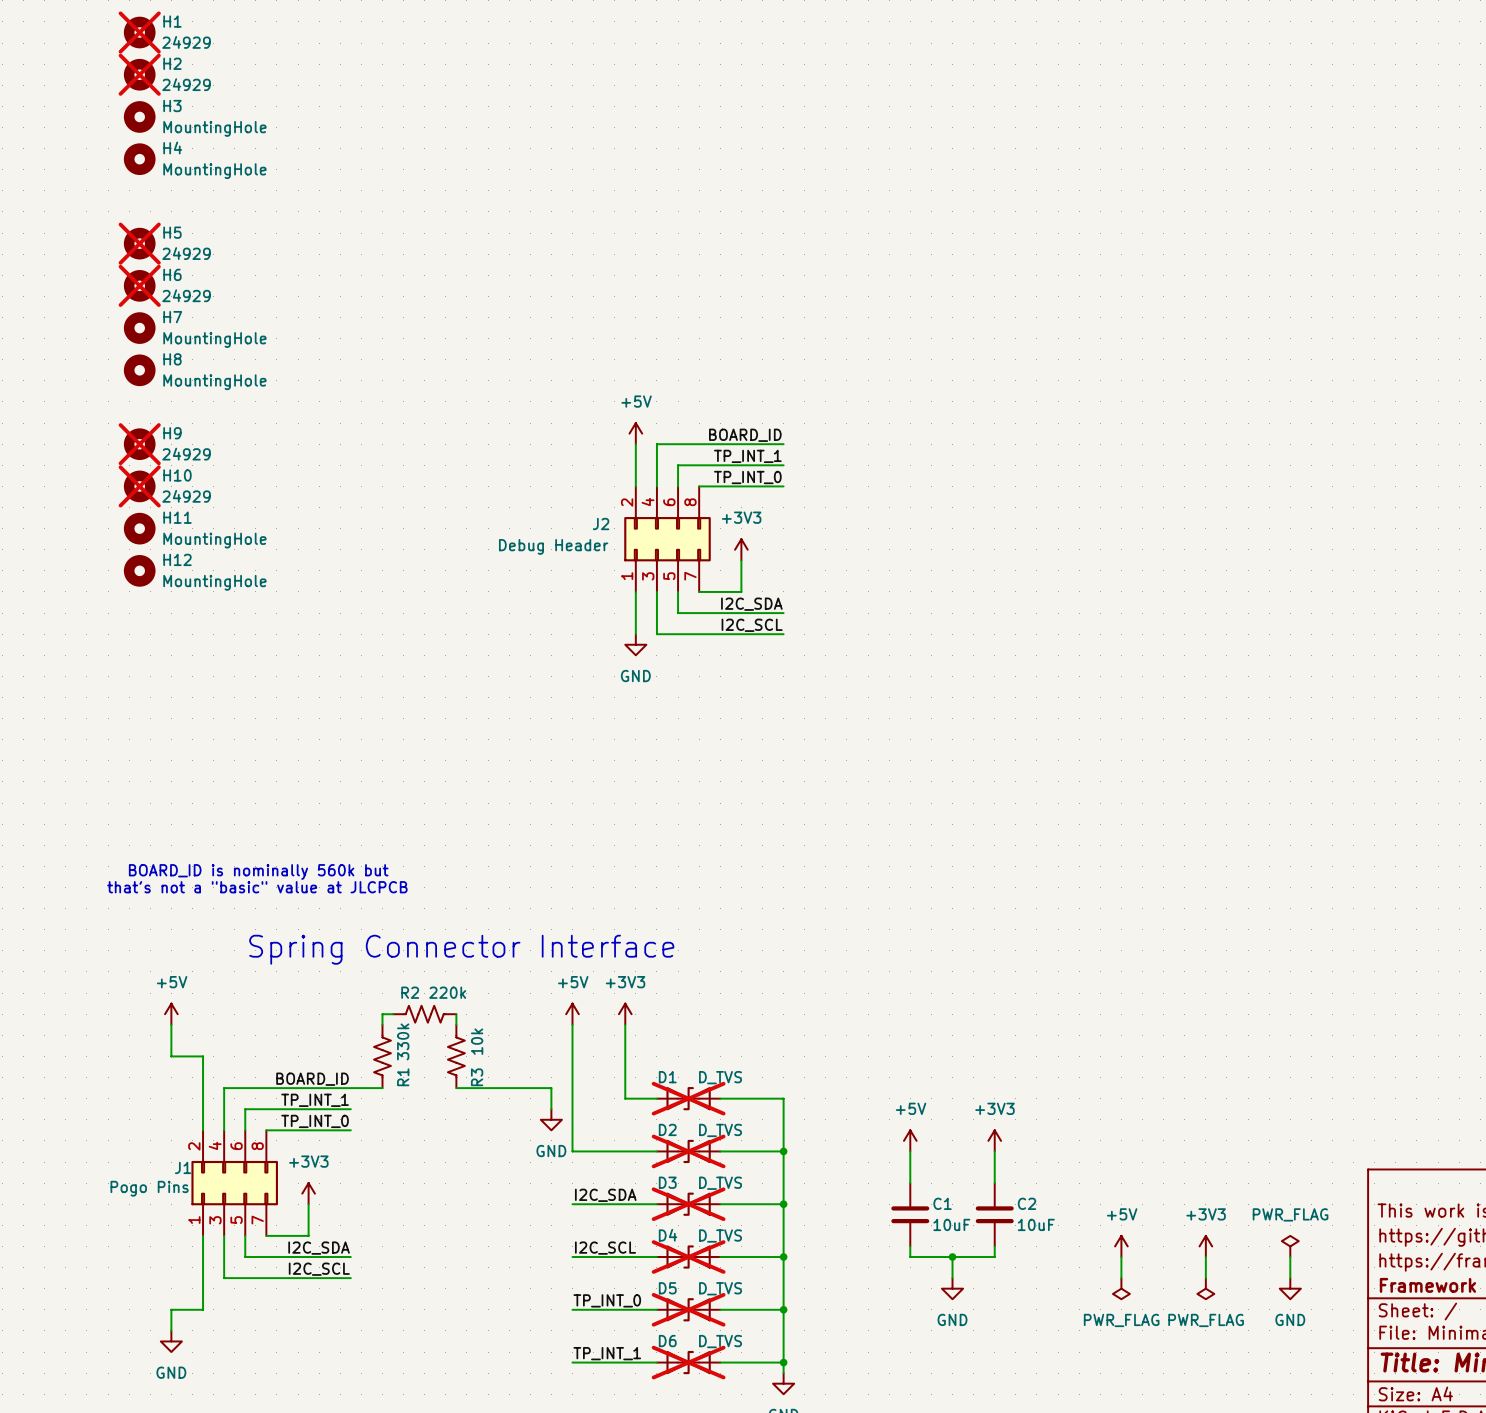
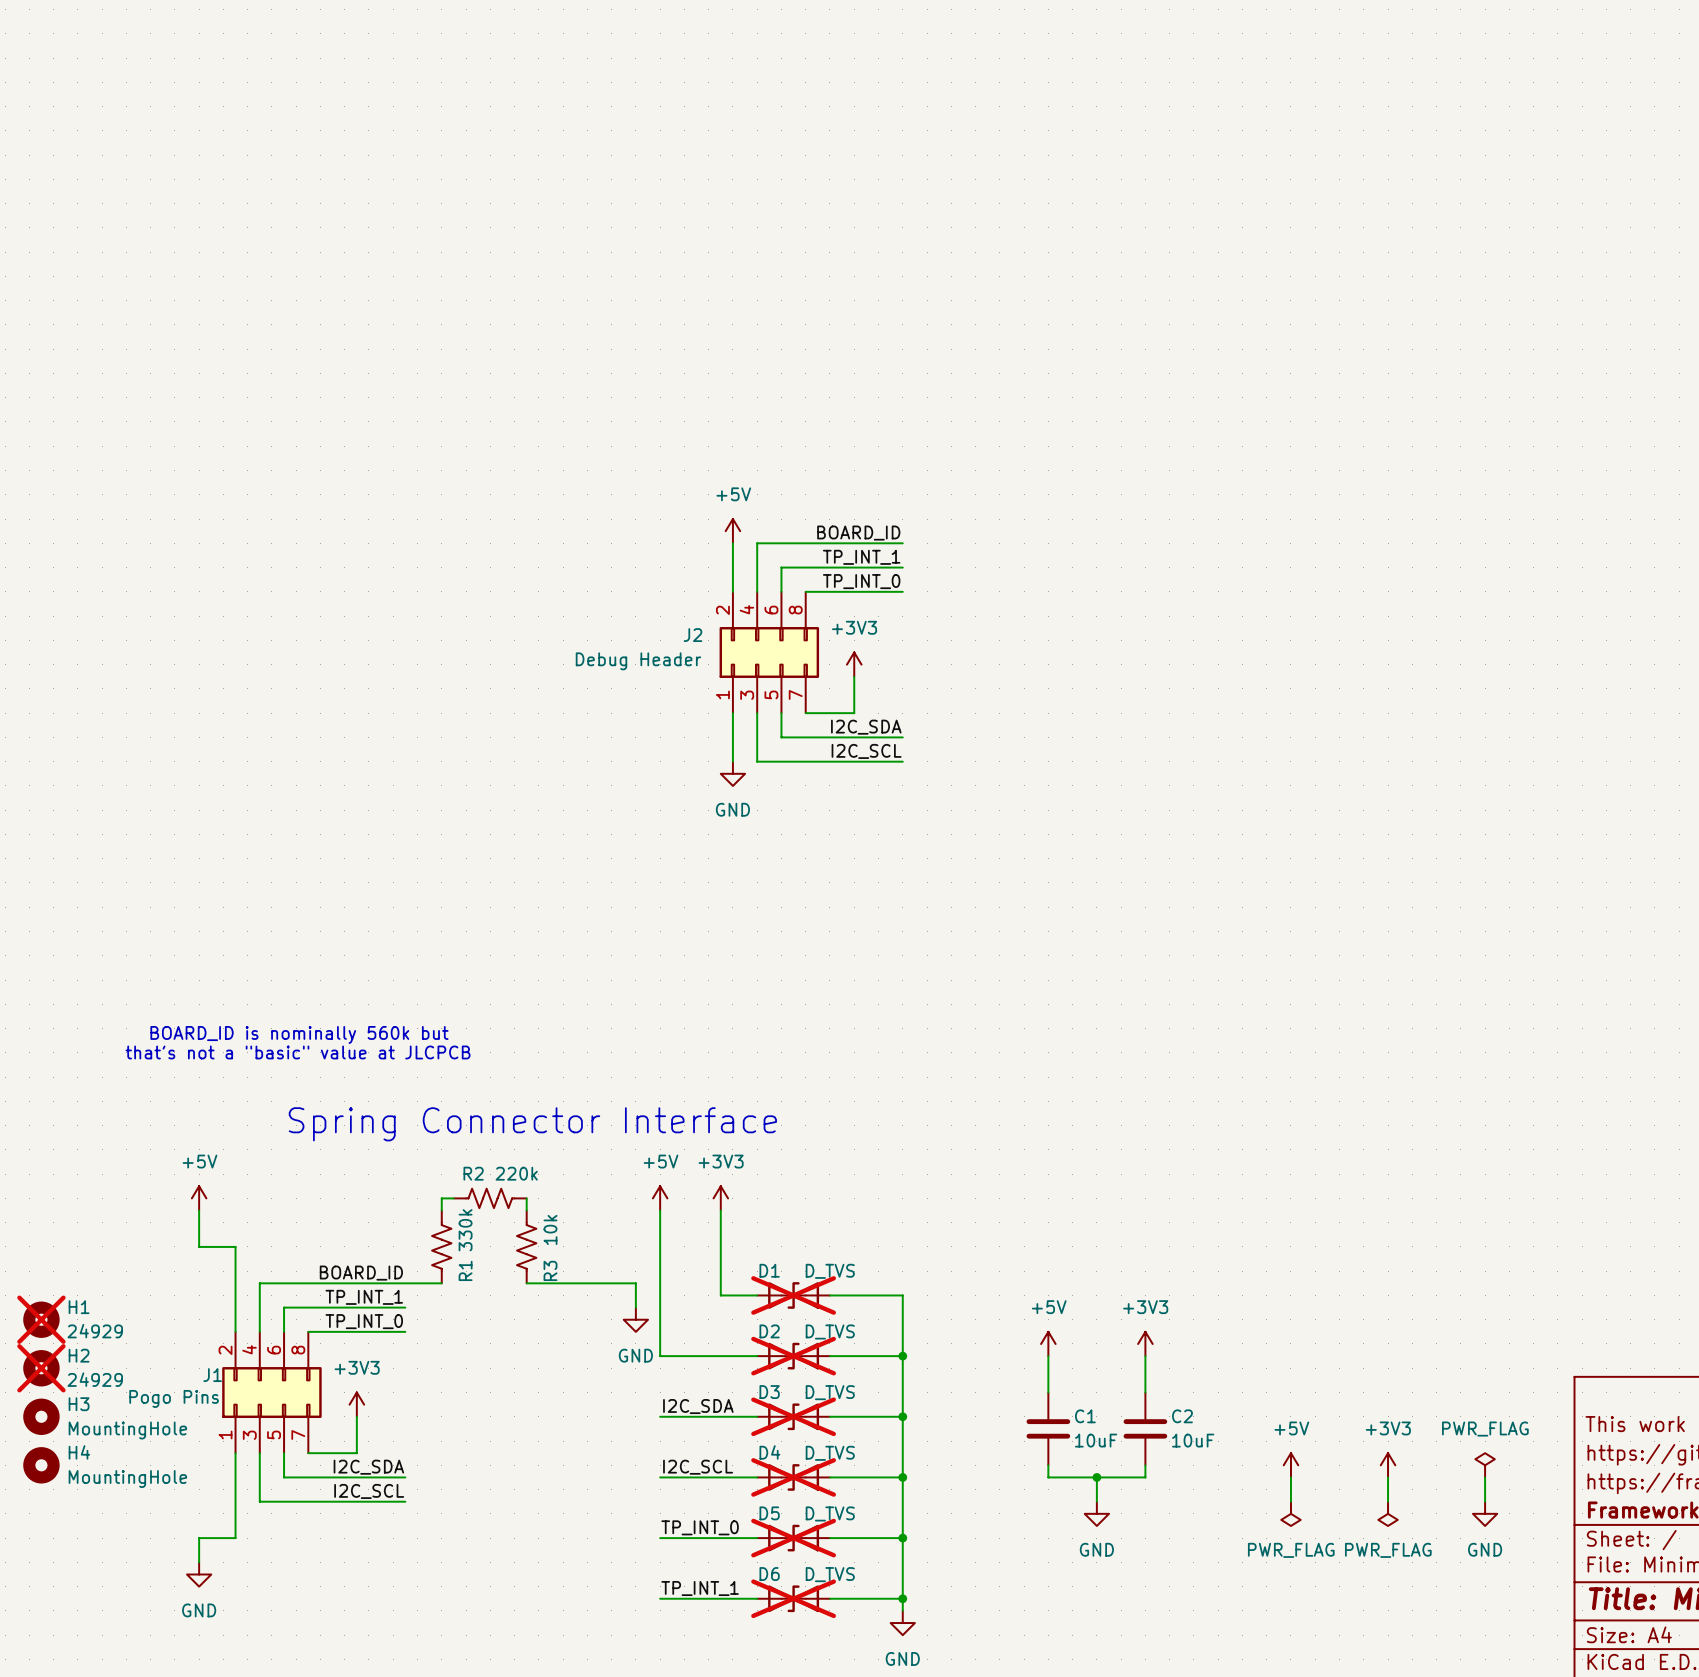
H1 position: (139, 32) -> (41, 1319)
H2 position: (139, 74) -> (41, 1368)
H3 position: (139, 116) -> (41, 1416)
H4 position: (139, 159) -> (41, 1465)
H5: 24929 (139, 243) -> none
H6: 24929 (139, 285) -> none
H7: MountingHole (139, 328) -> none
H8: MountingHole (139, 370) -> none
H9: 24929 (139, 444) -> none
H10: 24929 (139, 486) -> none
H11: MountingHole (139, 528) -> none
H12: MountingHole (139, 570) -> none

